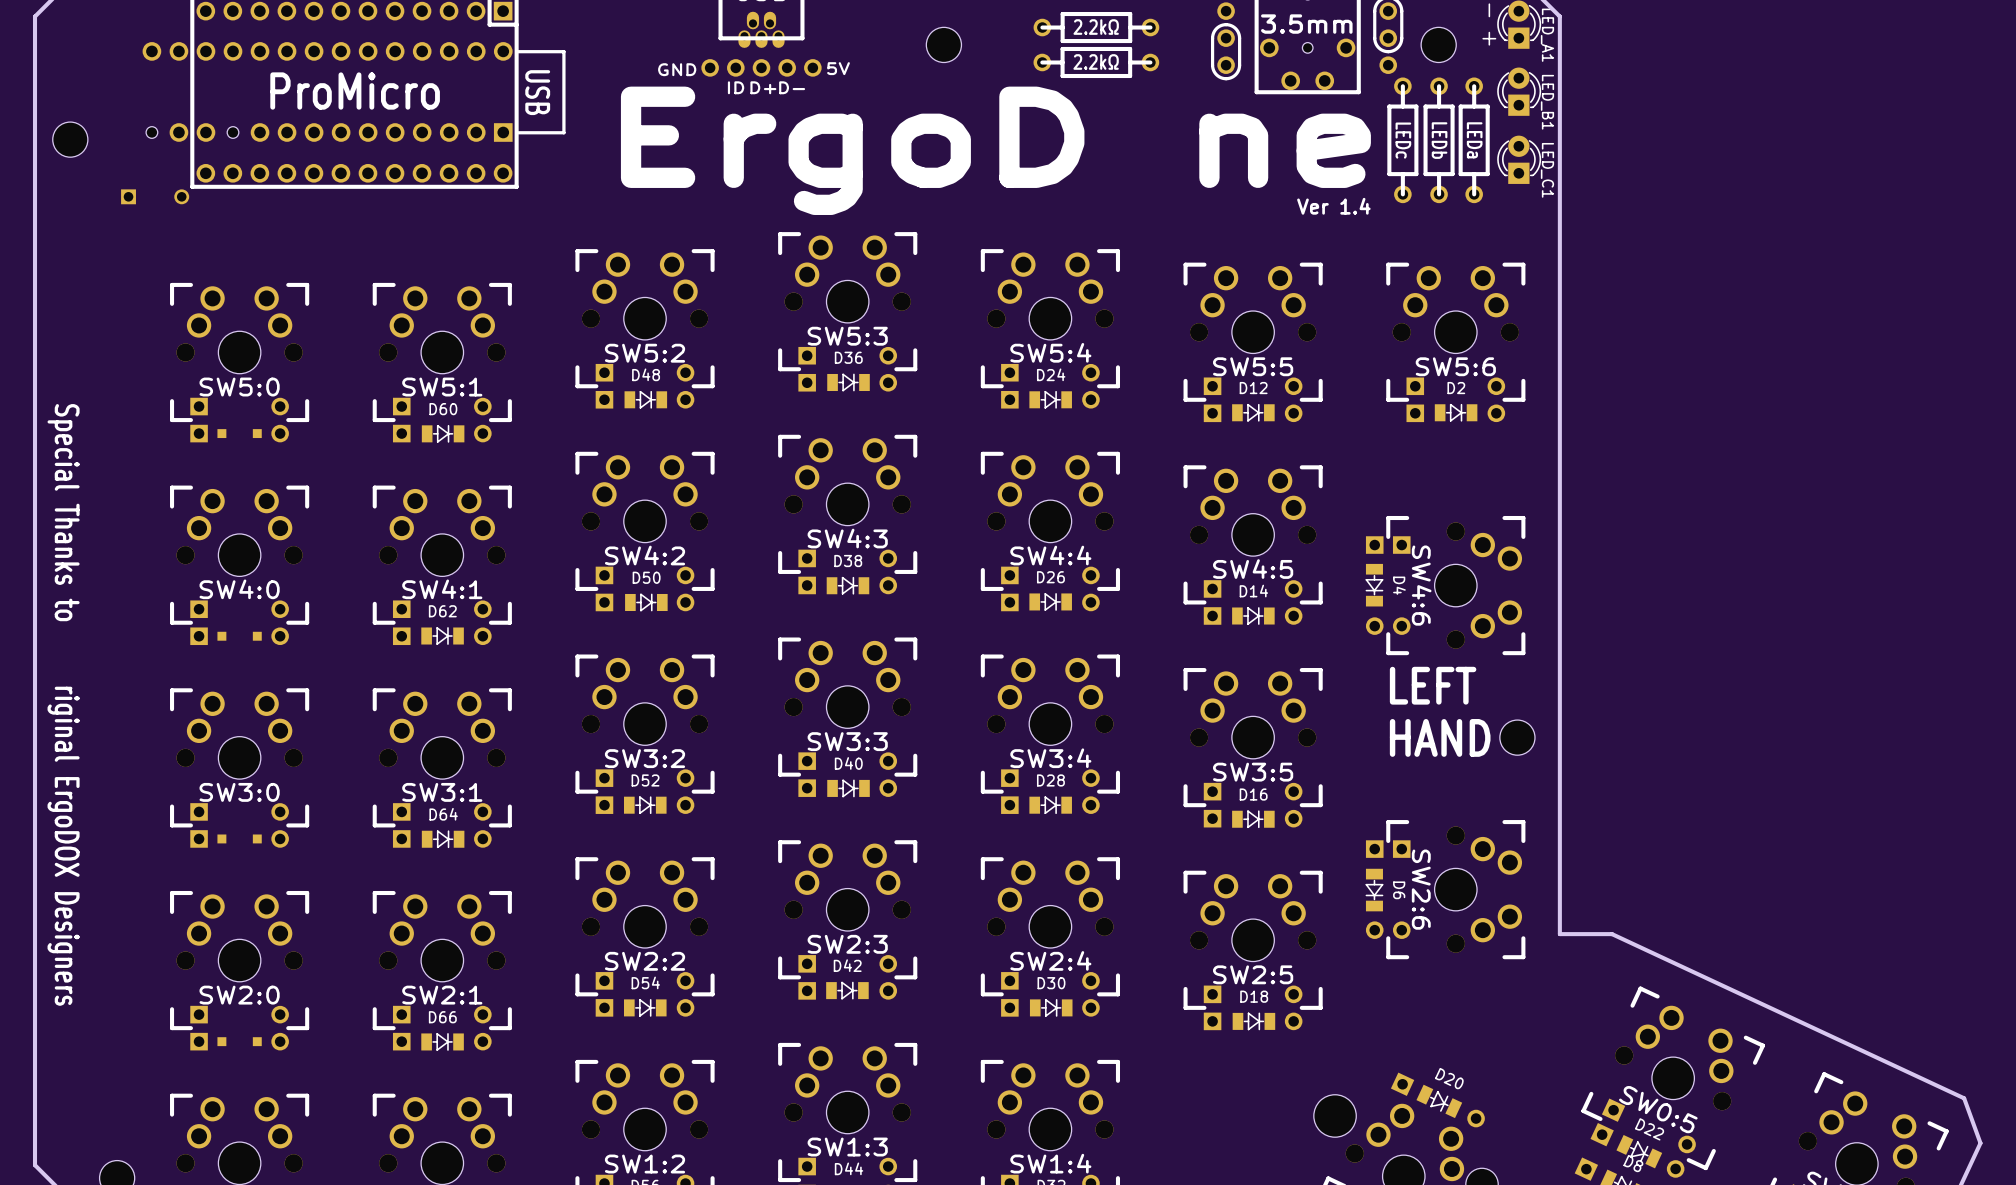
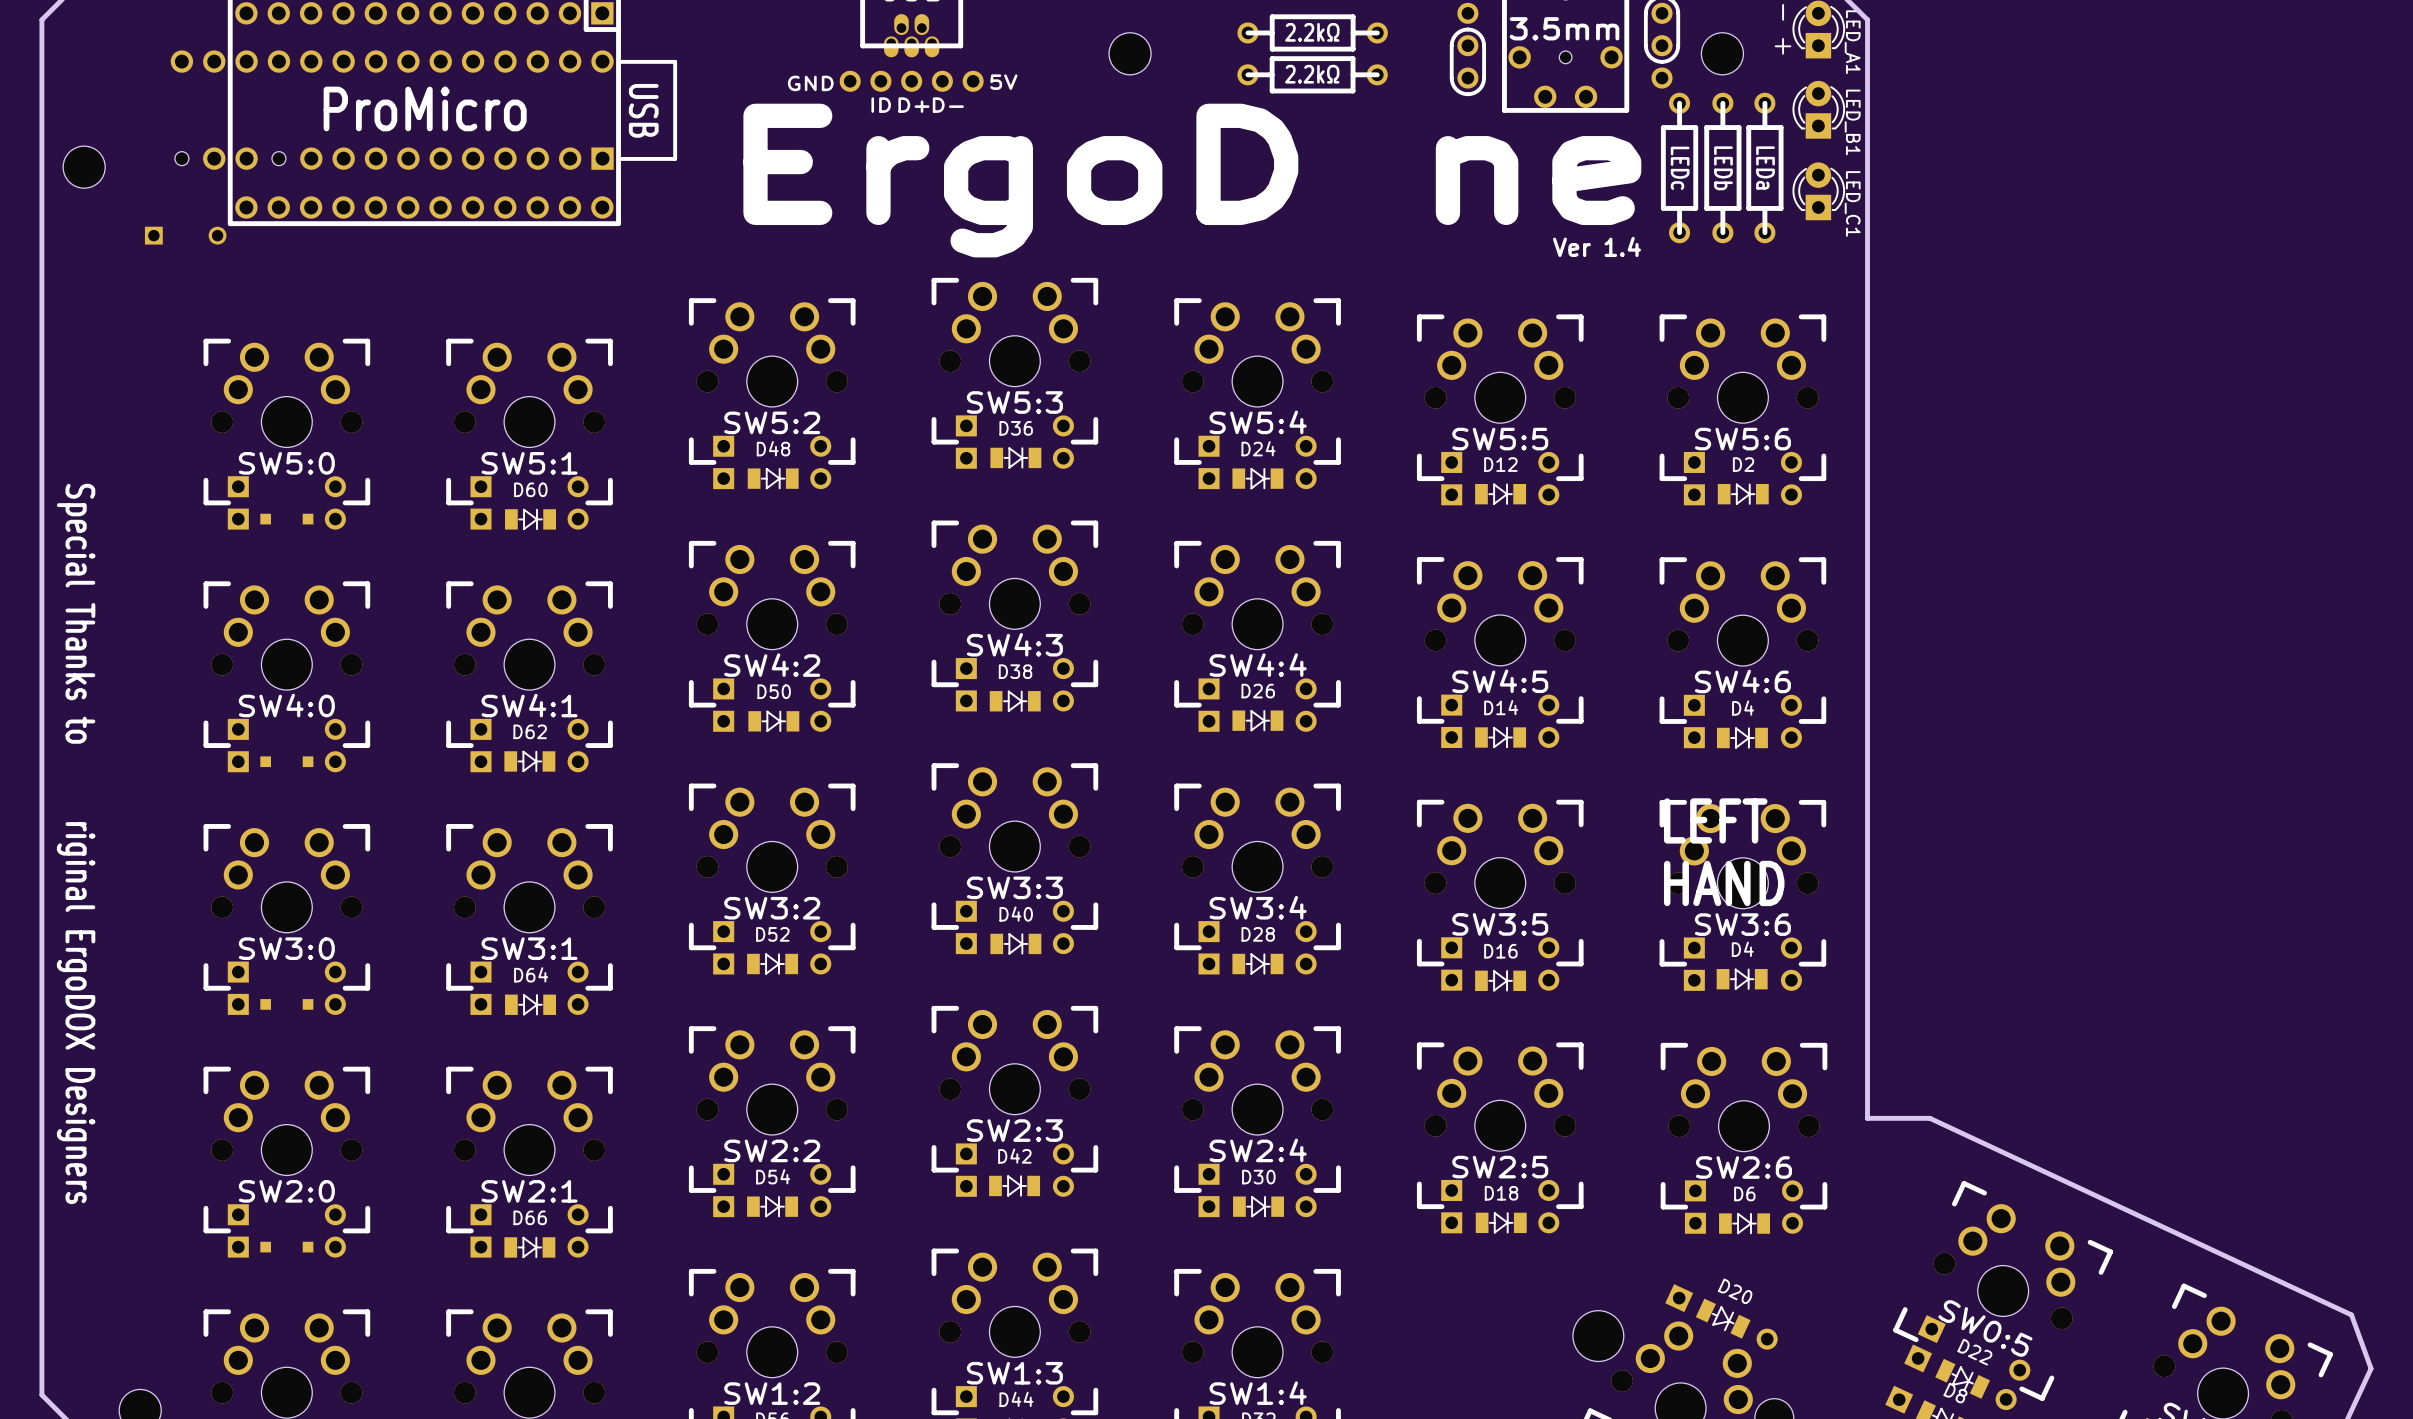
D4 rotation: 0° (1374, 585) -> 90° clockwise (1742, 737)
D4 position: (1374, 585) -> (1742, 737)
D4 name position: D4 (1399, 585) -> D4 (1743, 708)
part rotation: 0° (1445, 585) -> 90° counterclockwise (1742, 652)
part: (1517, 737) -> none
part: none -> SW3:6 (1742, 895)
D4: none -> (1742, 979)
part rotation: 0° (1445, 889) -> 90° counterclockwise (1744, 1138)
D6 rotation: 0° (1374, 890) -> 90° clockwise (1744, 1223)
D6 position: (1374, 890) -> (1744, 1223)
D6 name position: D6 (1399, 890) -> D6 (1744, 1193)

